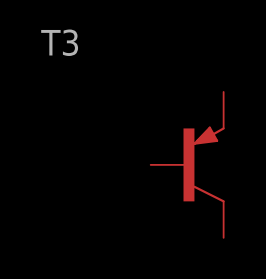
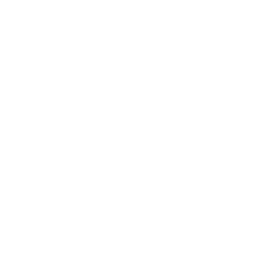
T3: (187, 164) -> none

